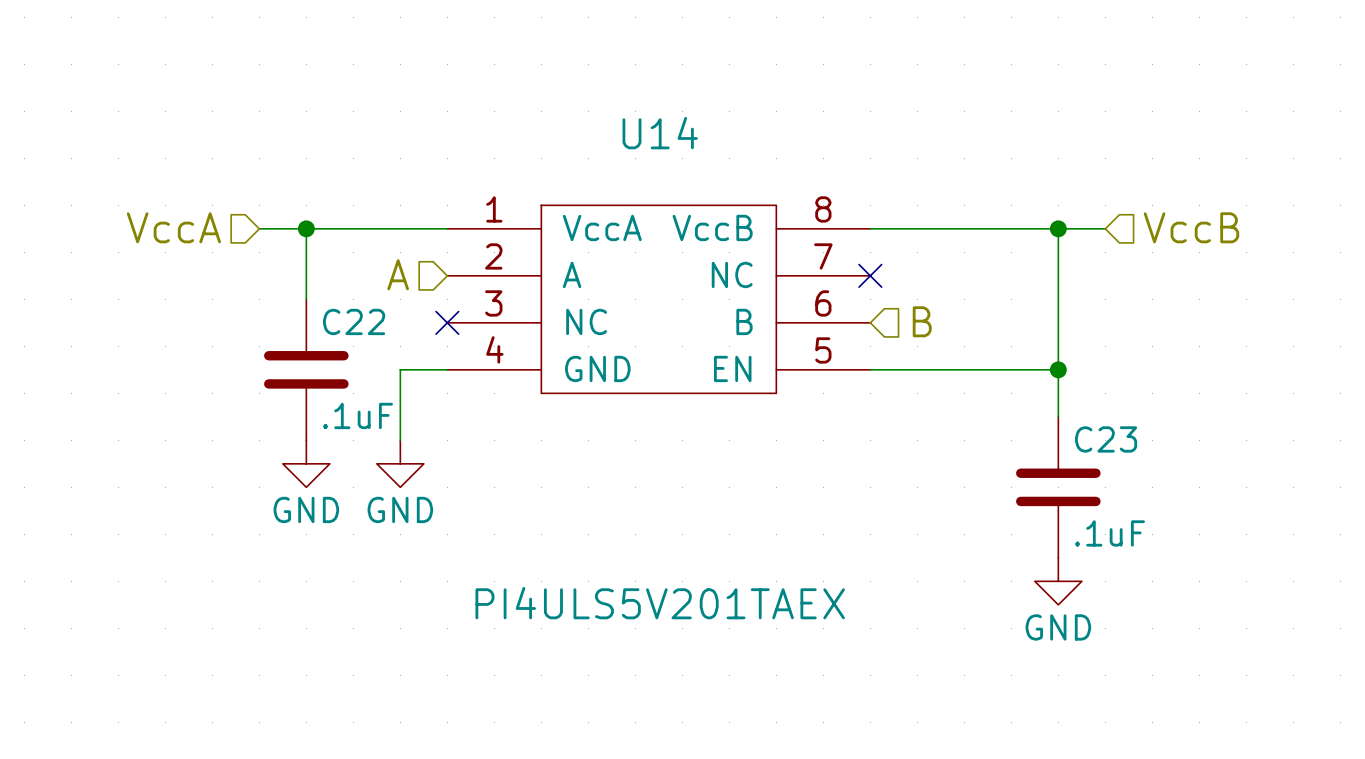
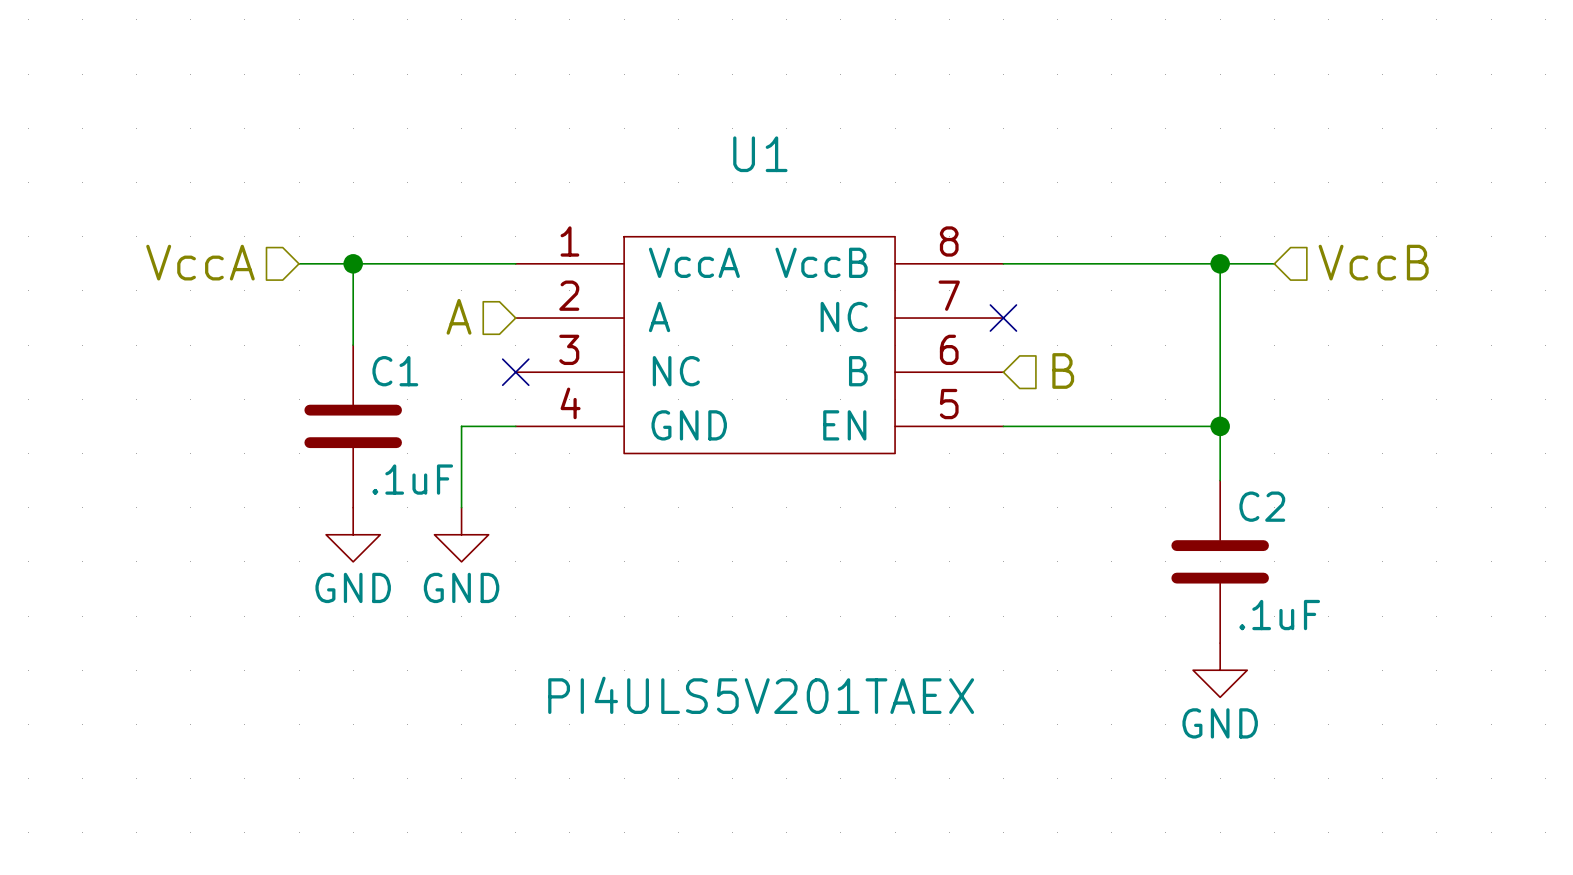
U14 name: U14 (660, 133) -> U1 (760, 154)
C22 name: C22 (354, 321) -> C1 (395, 371)
C23 name: C23 (1106, 439) -> C2 (1262, 506)

